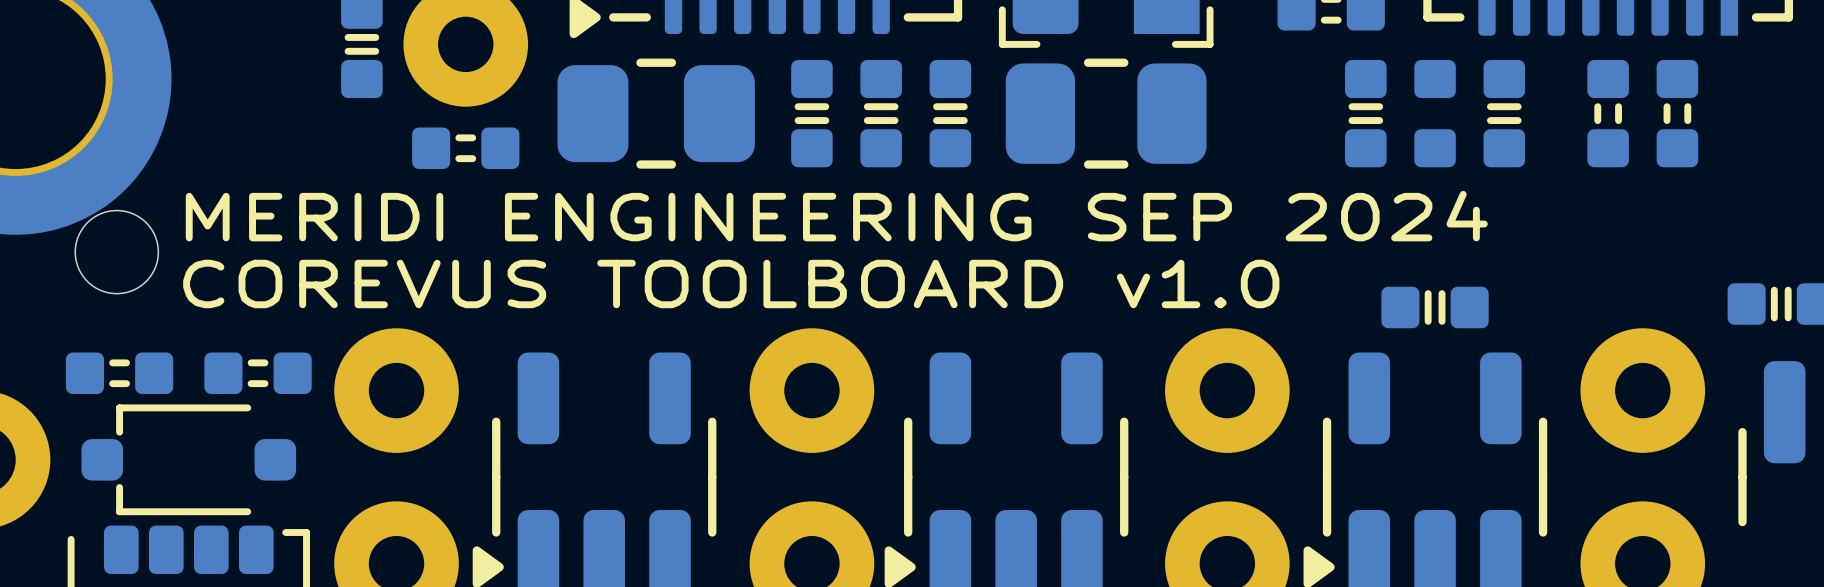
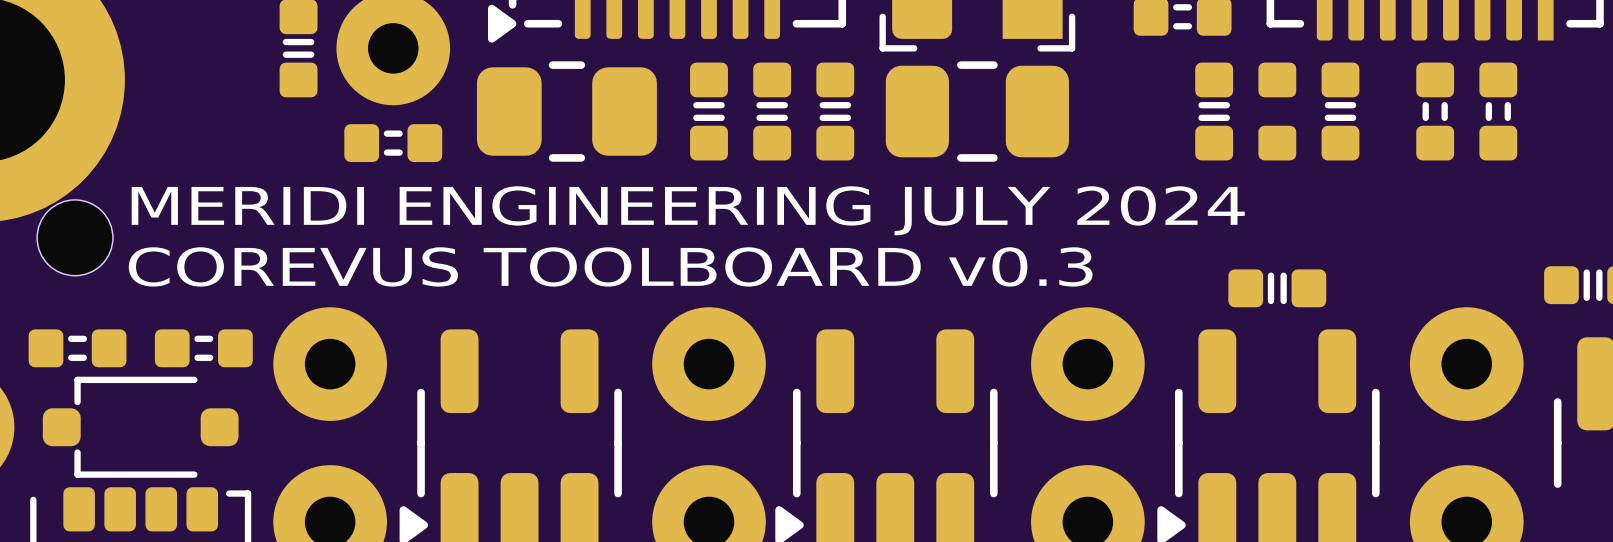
text: MERIDI ENGINEERING SEP 2024 (836, 216) -> MERIDI ENGINEERING JULY 2024 (688, 210)
text: COREVUS TOOLBOARD v1.0 (731, 283) -> COREVUS TOOLBOARD v0.3 (610, 266)

